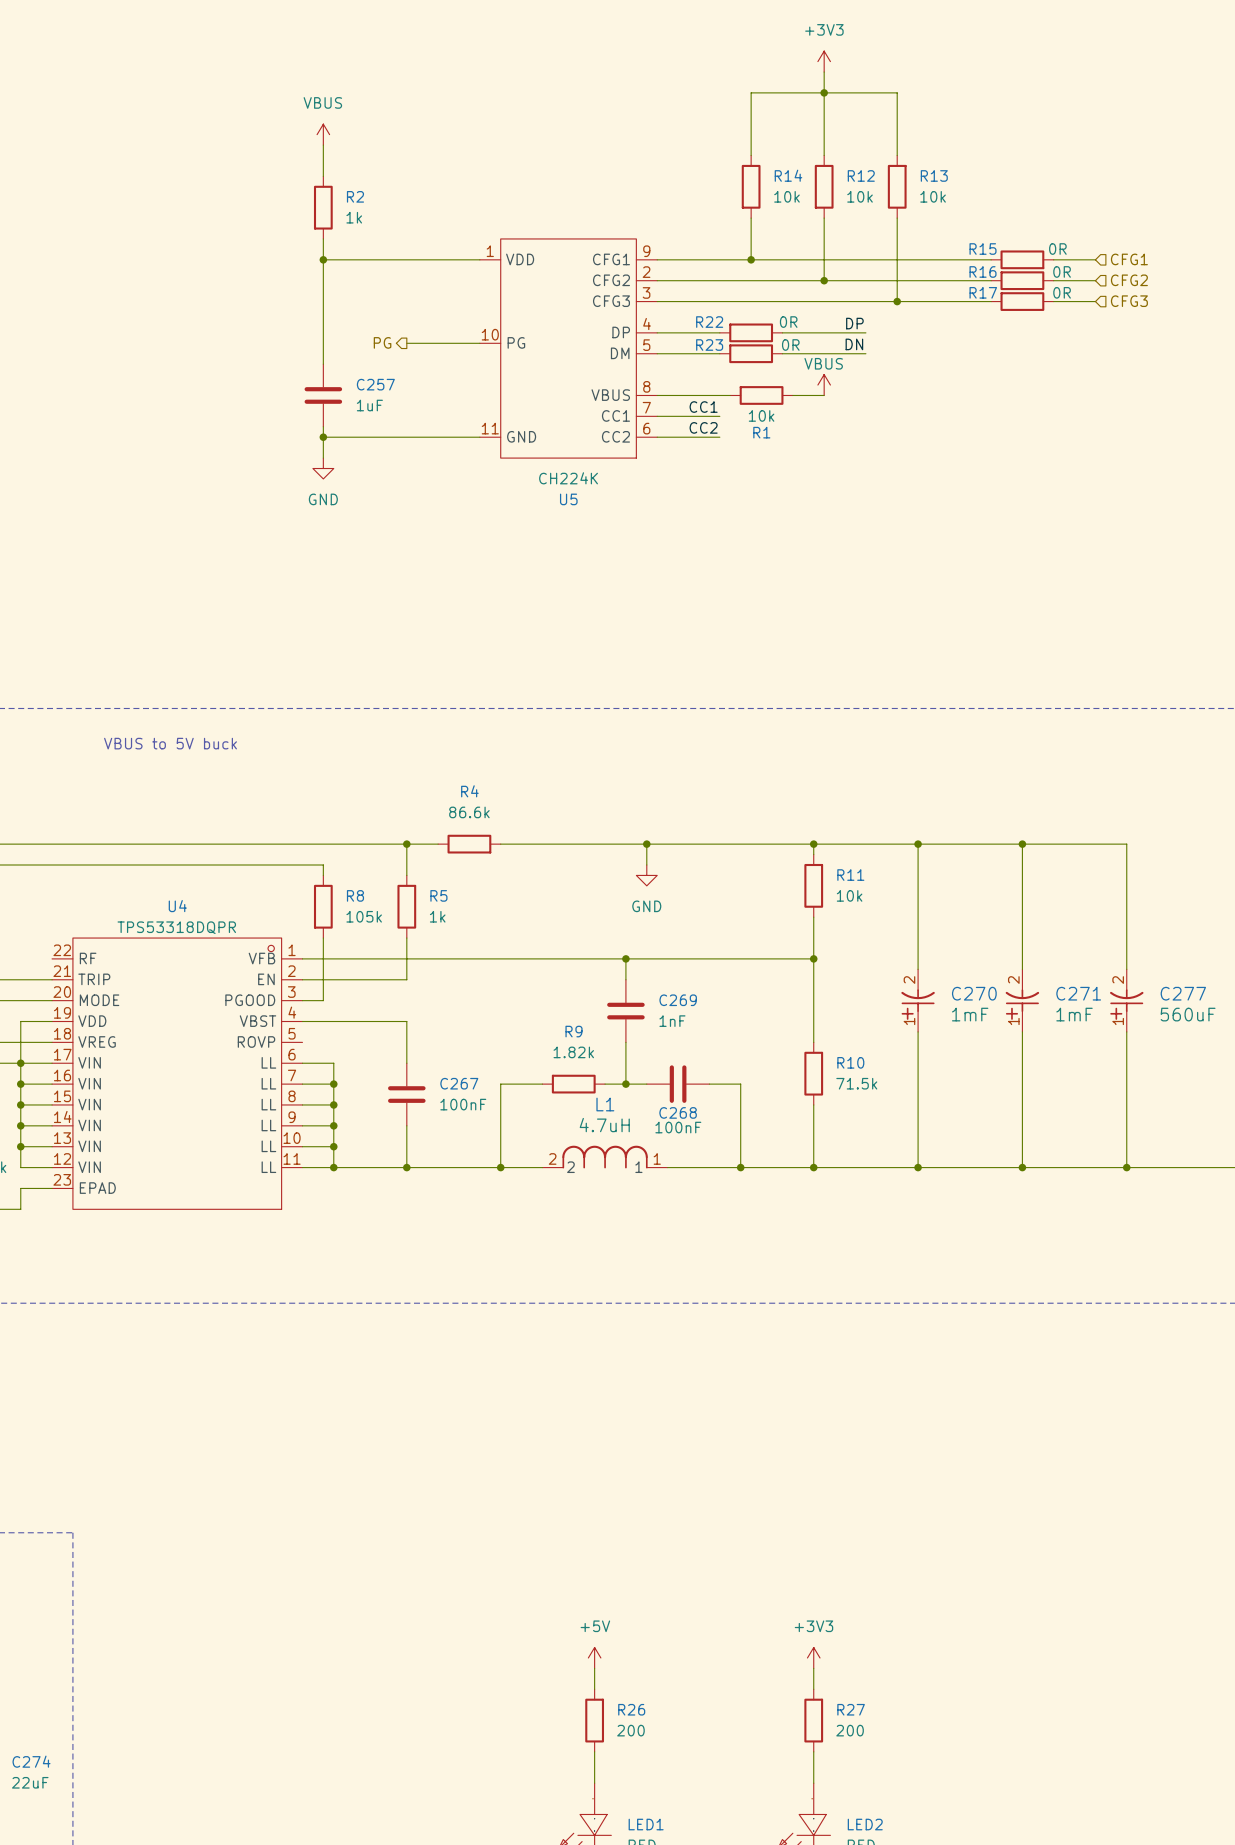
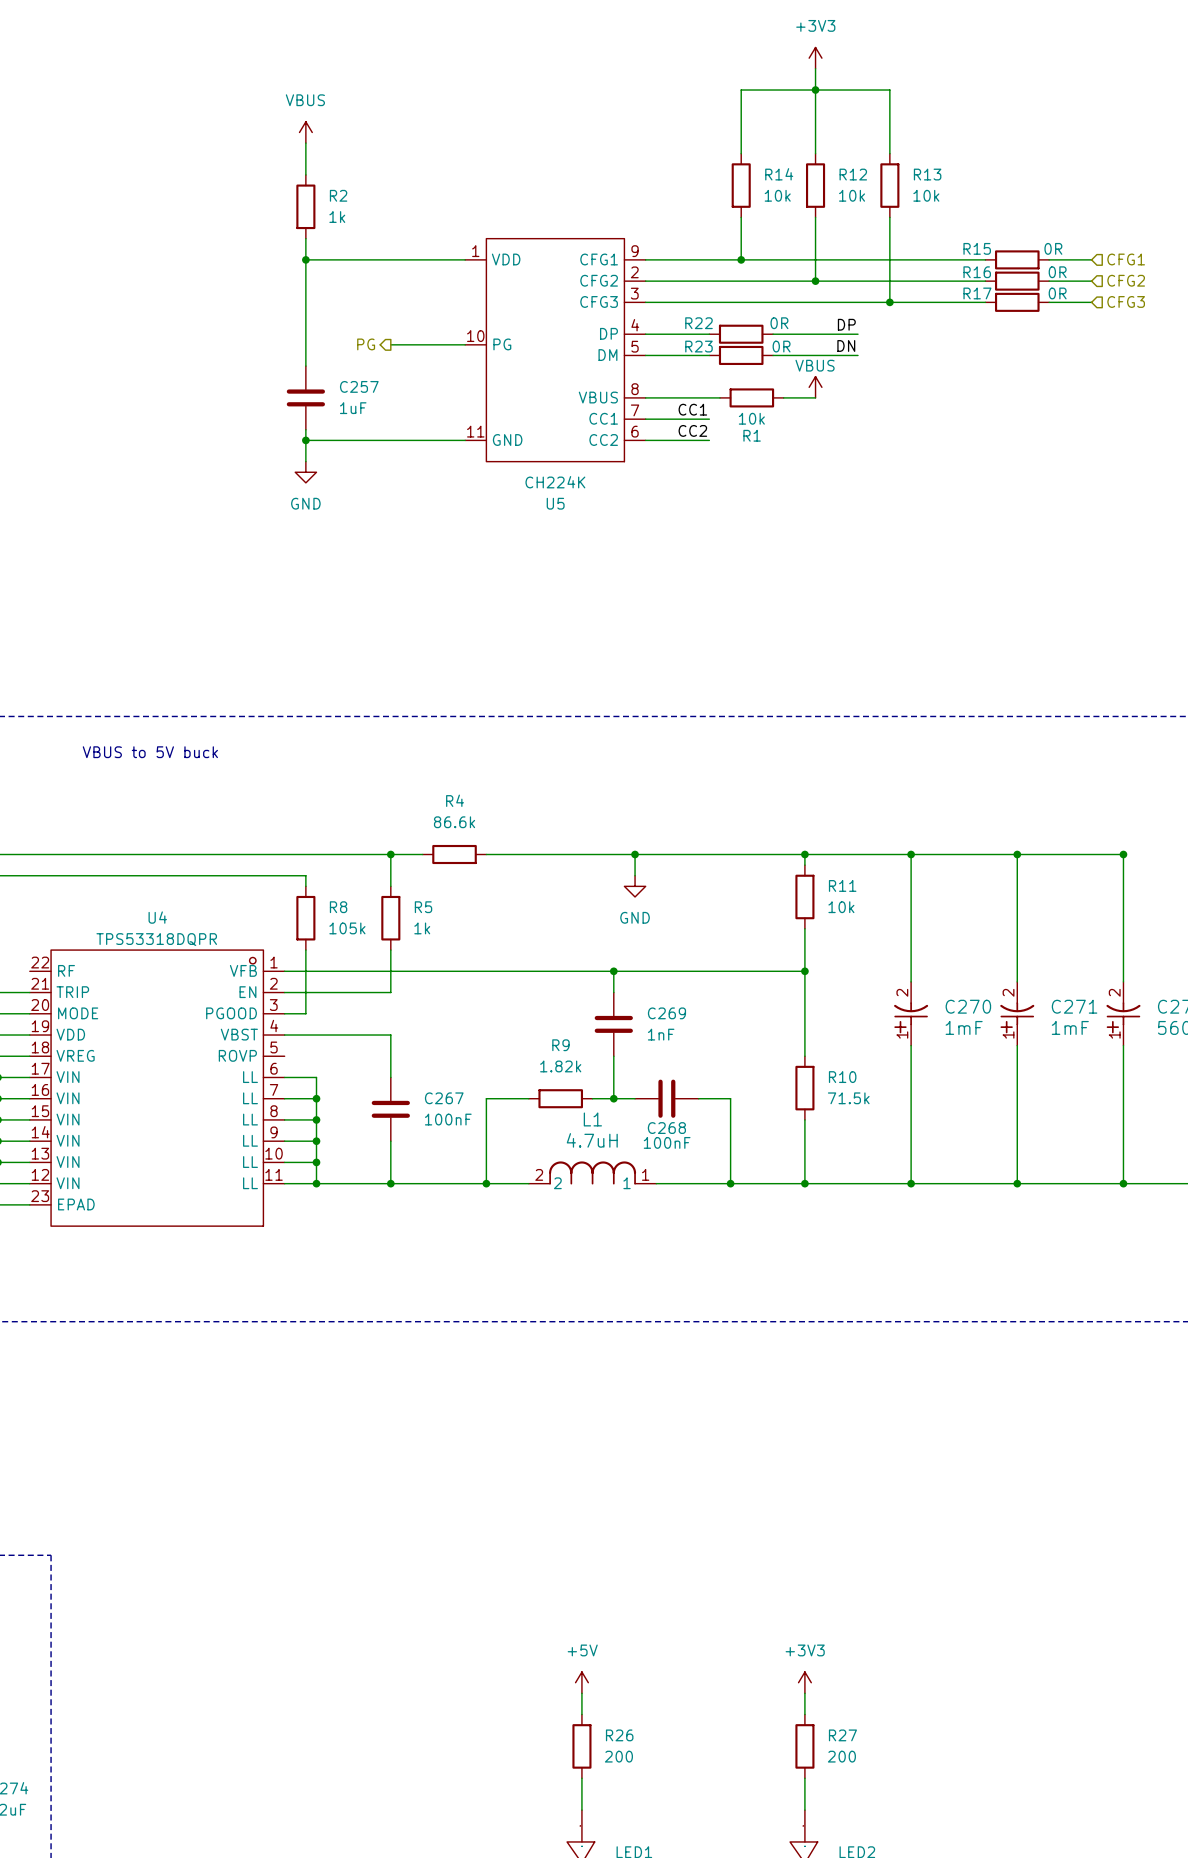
junction: none -> (1123, 854)

